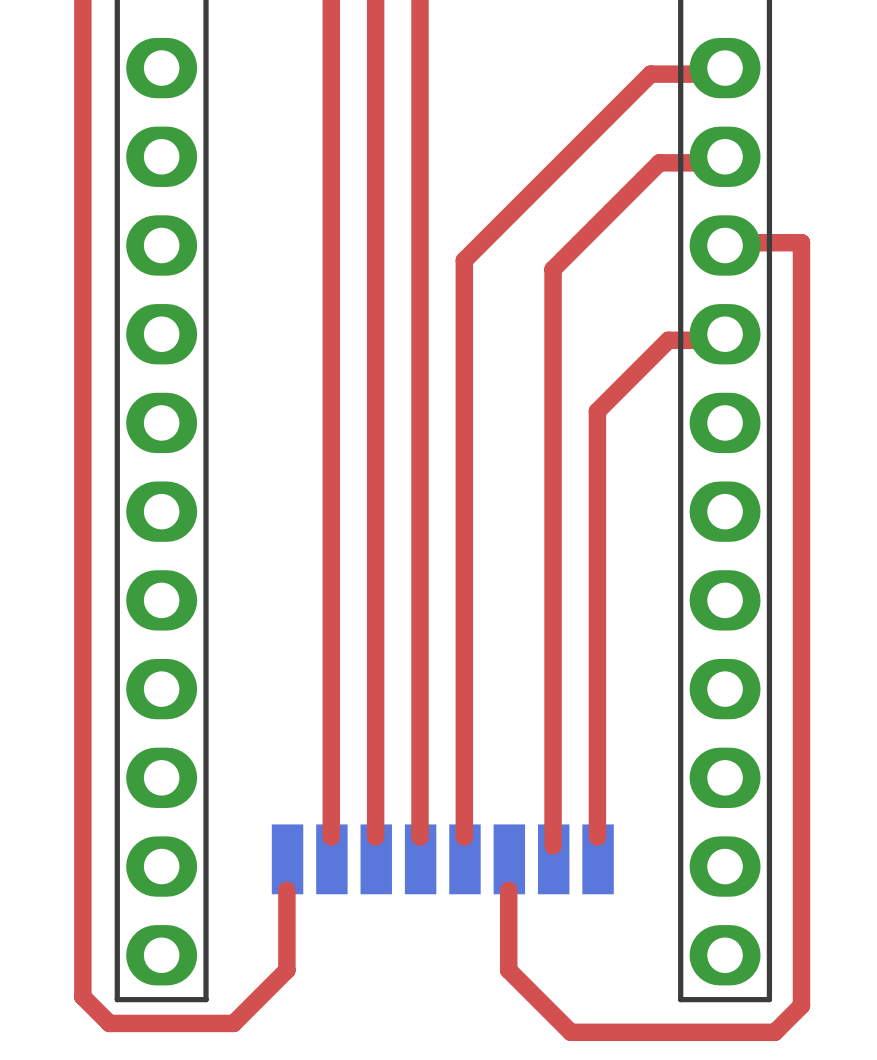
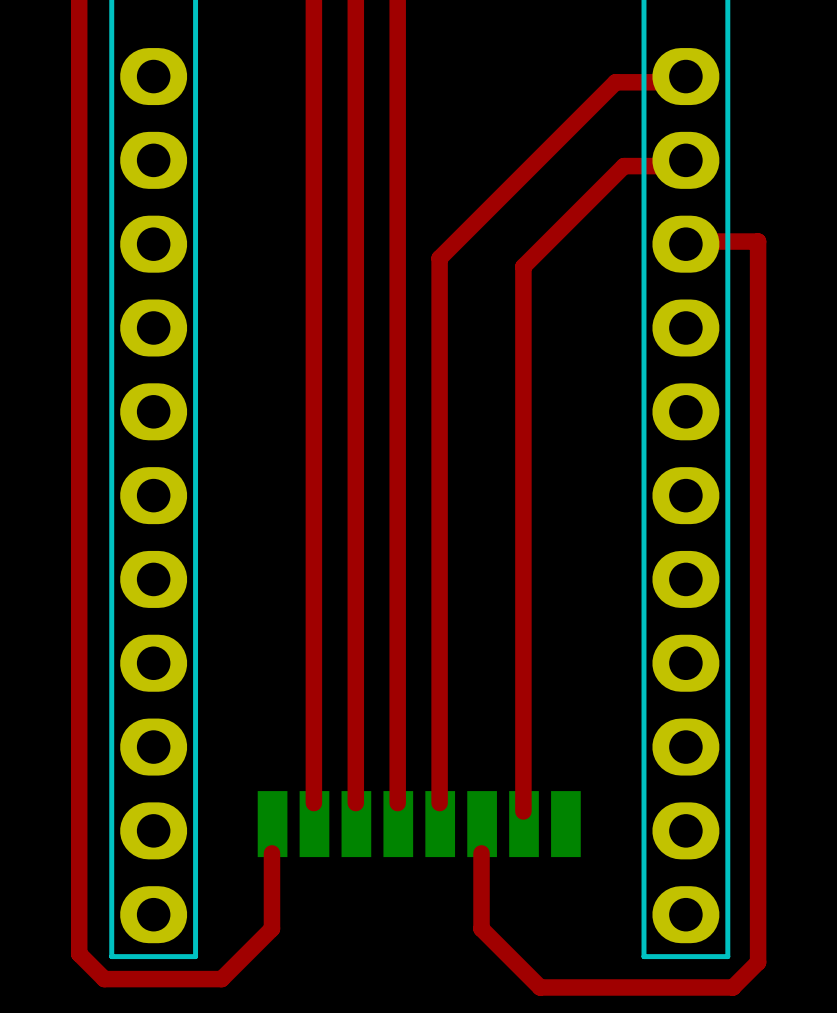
top track: (725, 334) (718, 340) (668, 340) (597, 411) (597, 837) -> none

